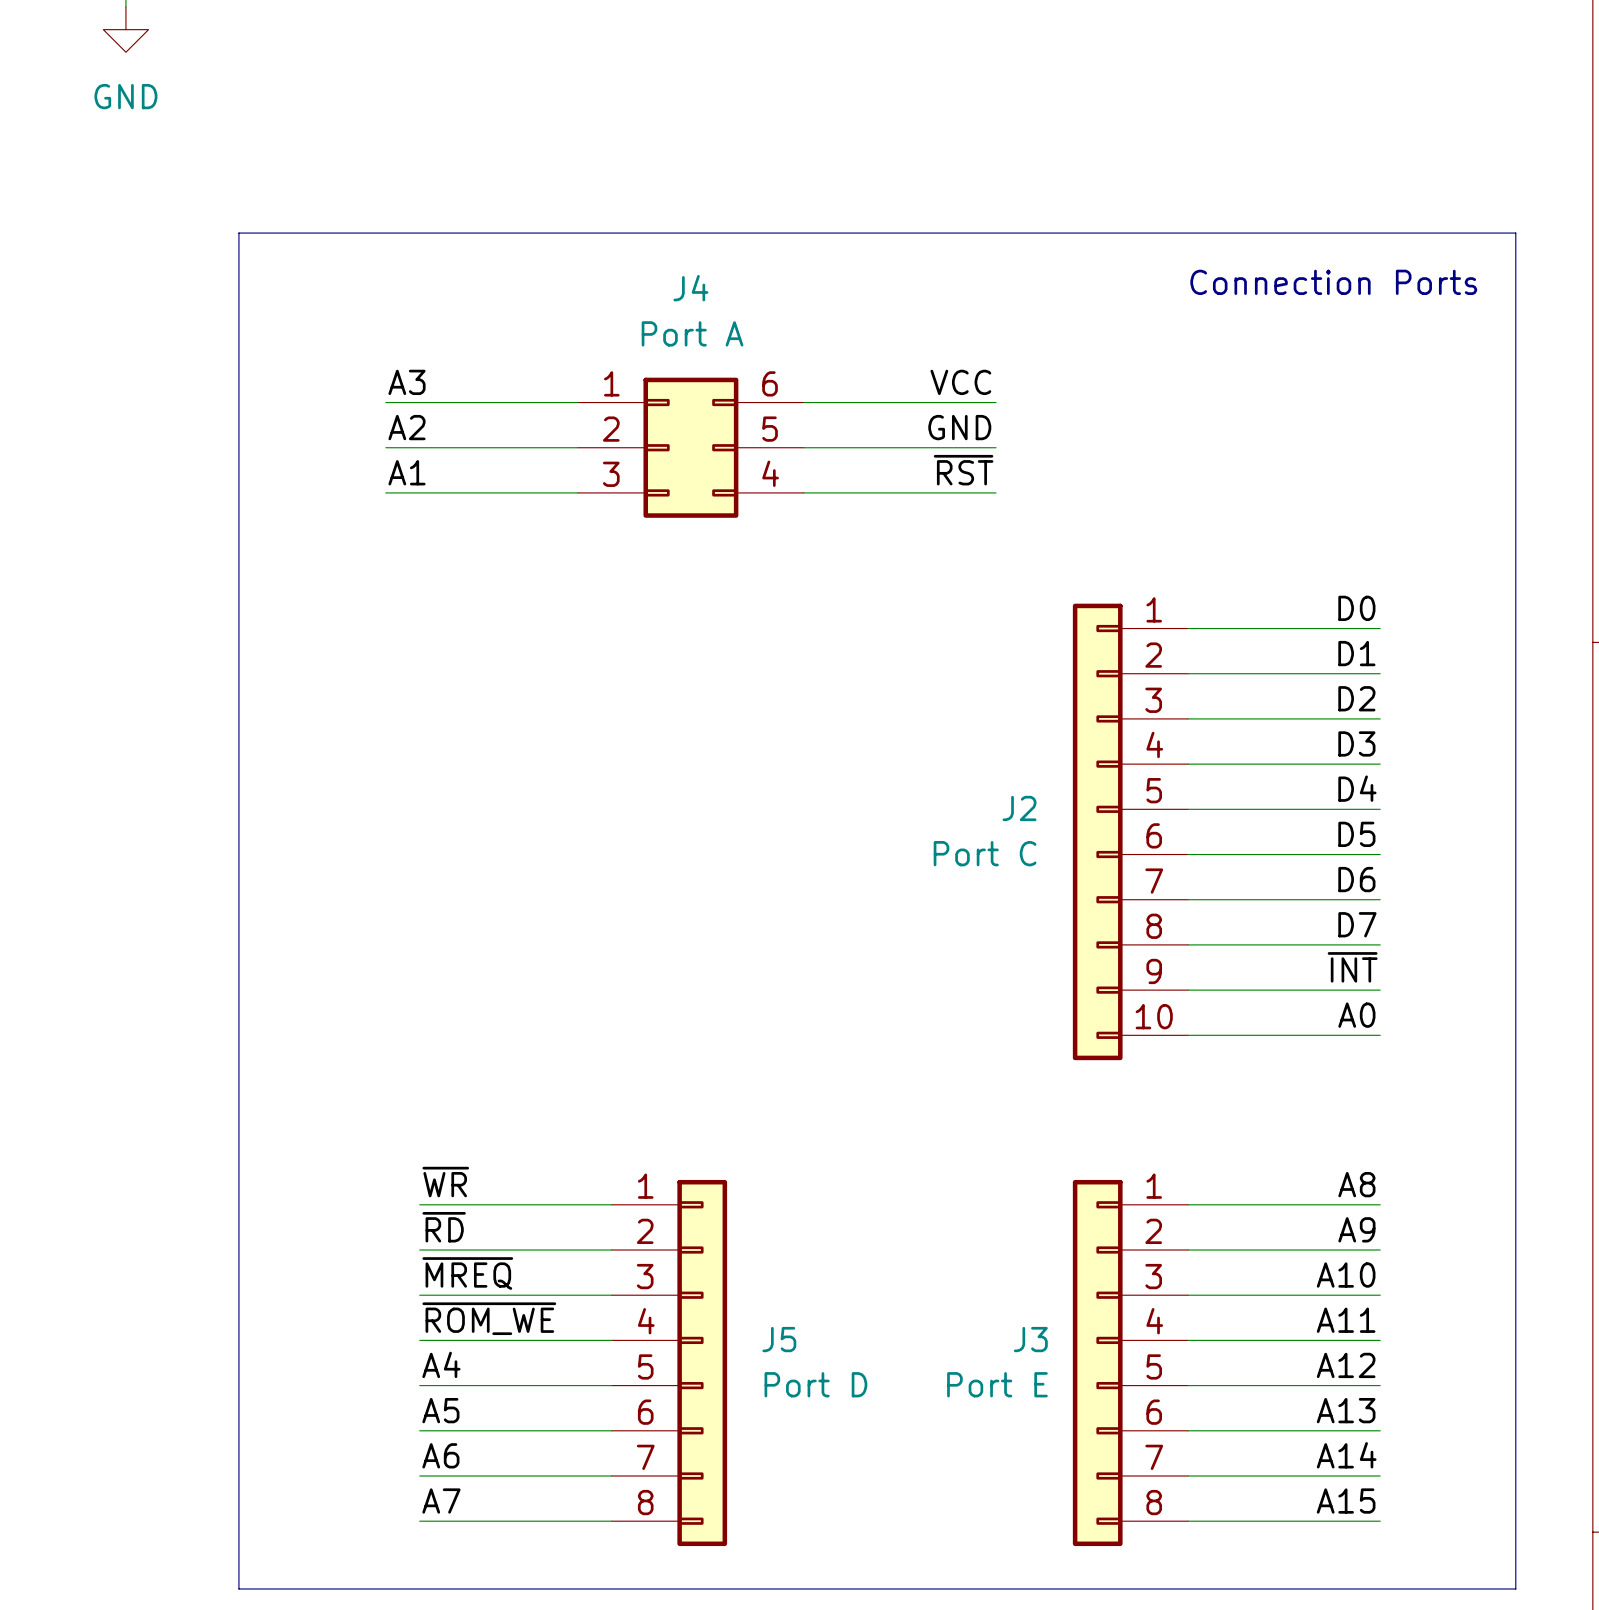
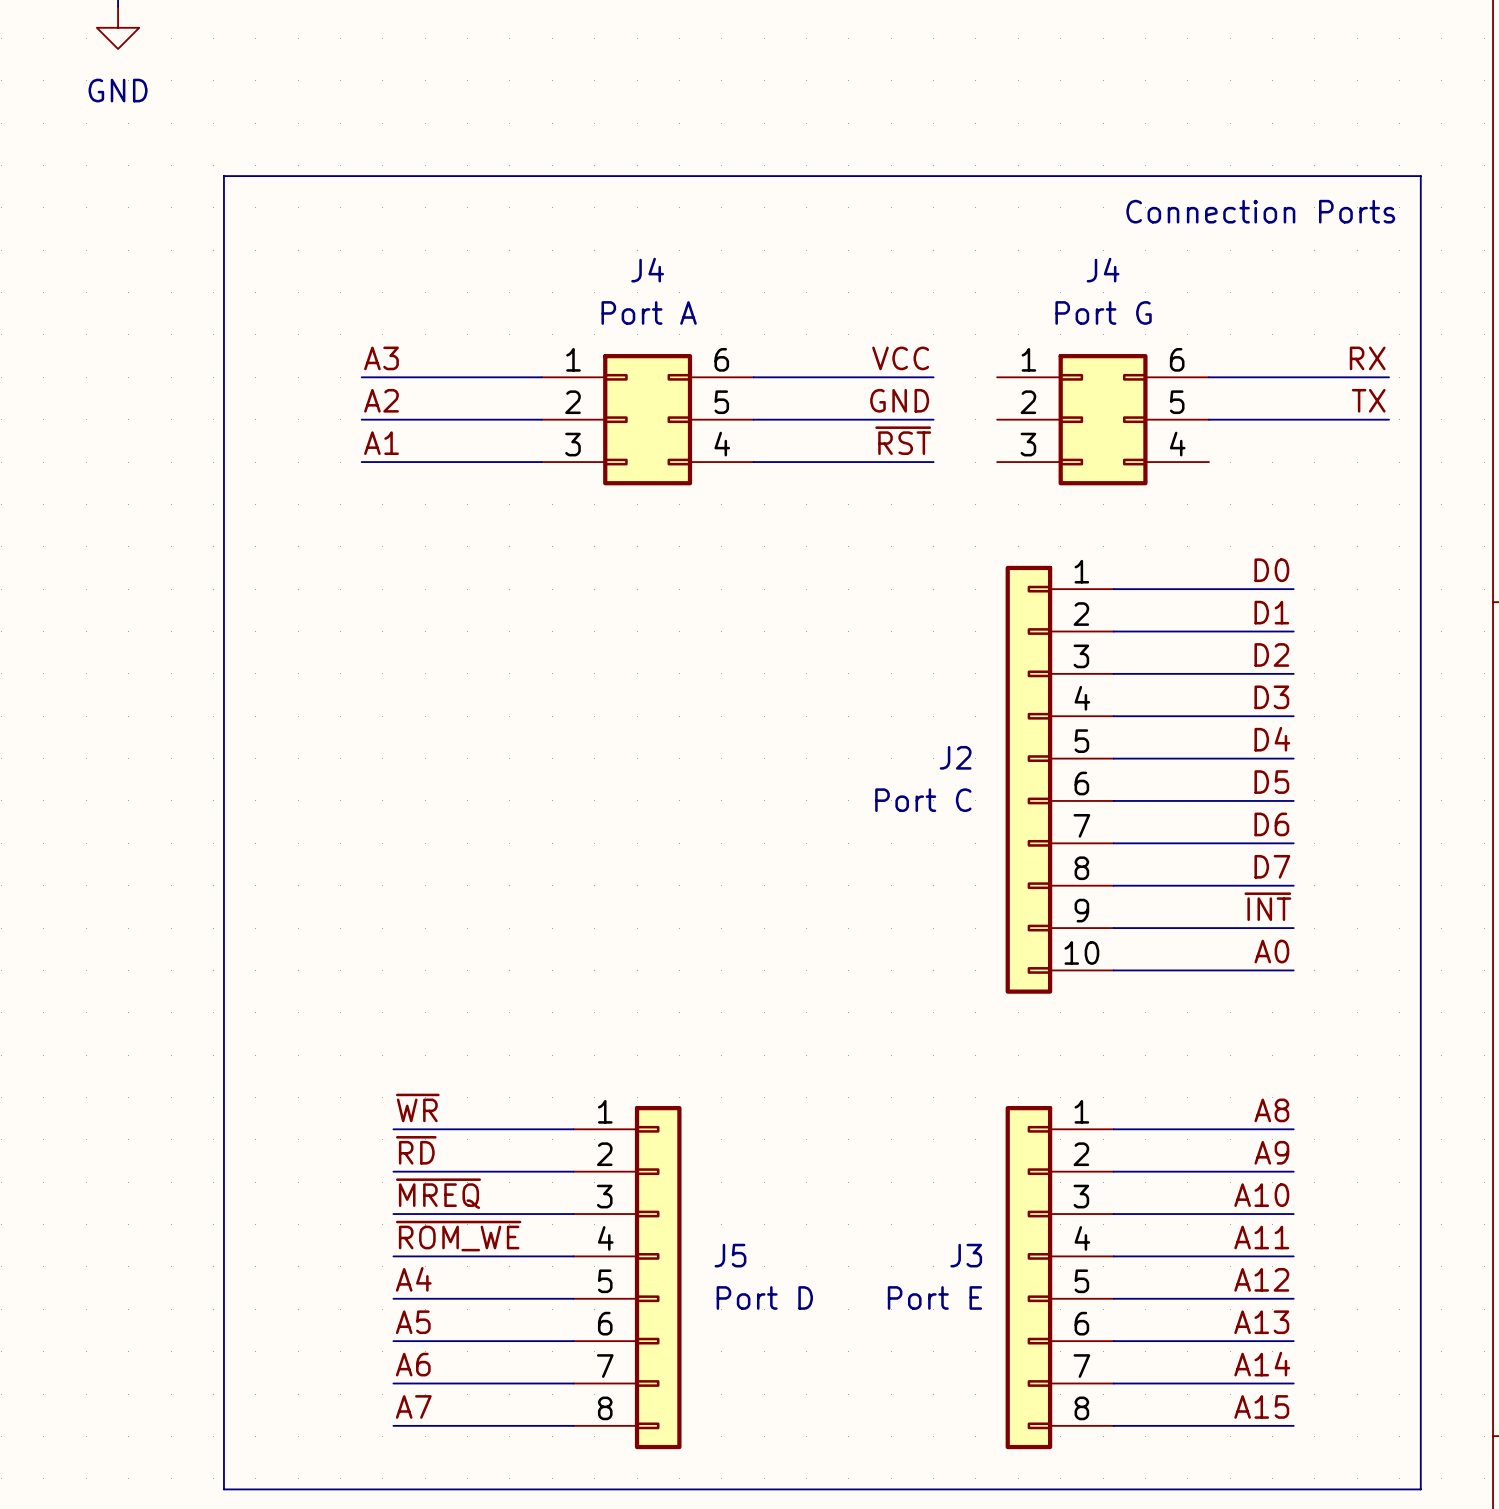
line: (238, 233) (1515, 233) -> (223, 218) (223, 176) (1420, 176) (1420, 218)
text position: Connection Ports (1333, 282) -> Connection Ports (1260, 211)
label: none -> RX (1367, 358)
wire: none -> (1208, 377) (1389, 377)
label: none -> TX (1368, 400)
J4: none -> Port G (1103, 419)
wire: none -> (1208, 419) (1389, 419)

